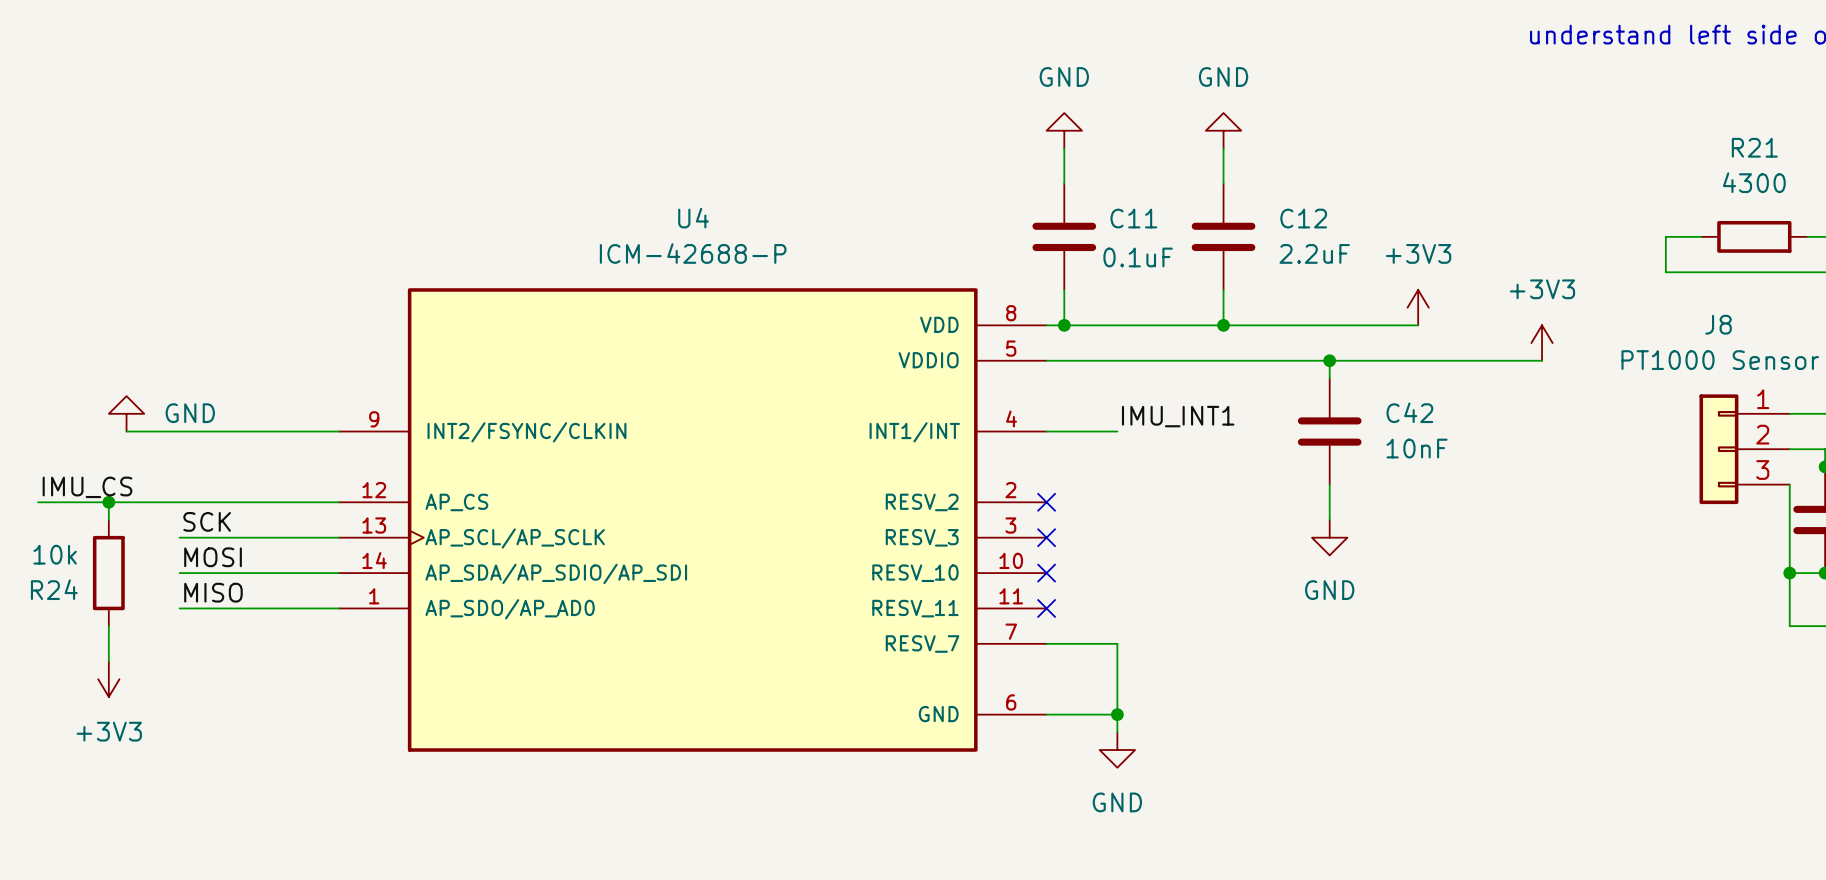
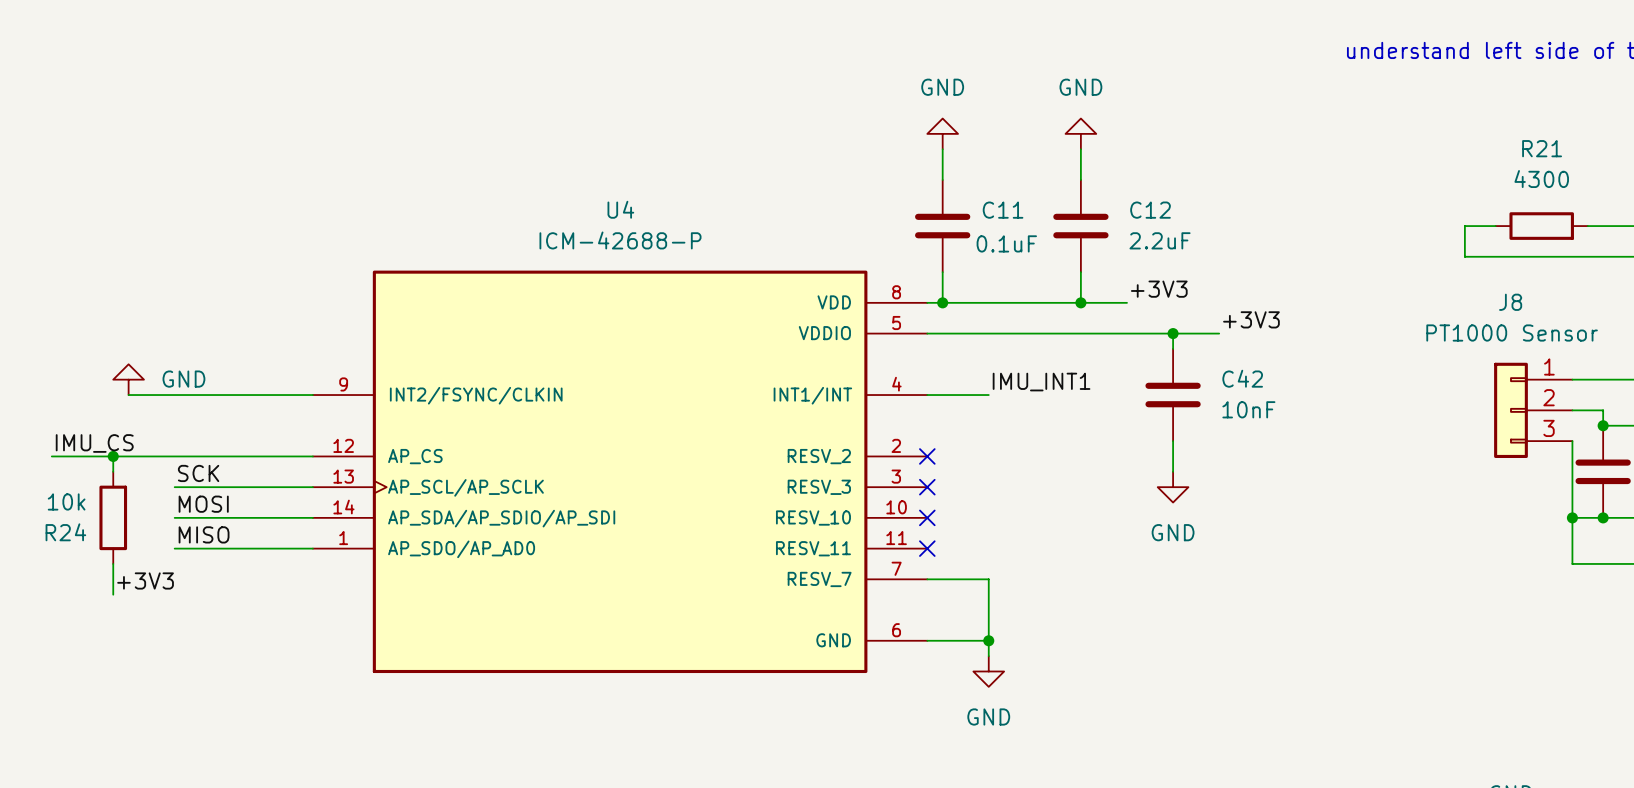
power symbol: +3V3 (1418, 307) -> none
label: none -> +3V3 (1159, 289)
wire: (1276, 325) (1418, 325) -> none
power symbol: +3V3 (1542, 343) -> none
label: none -> +3V3 (1251, 319)
wire: (1382, 360) (1542, 360) -> none
label: none -> +3V3 (145, 580)
power symbol: +3V3 (108, 679) -> none

